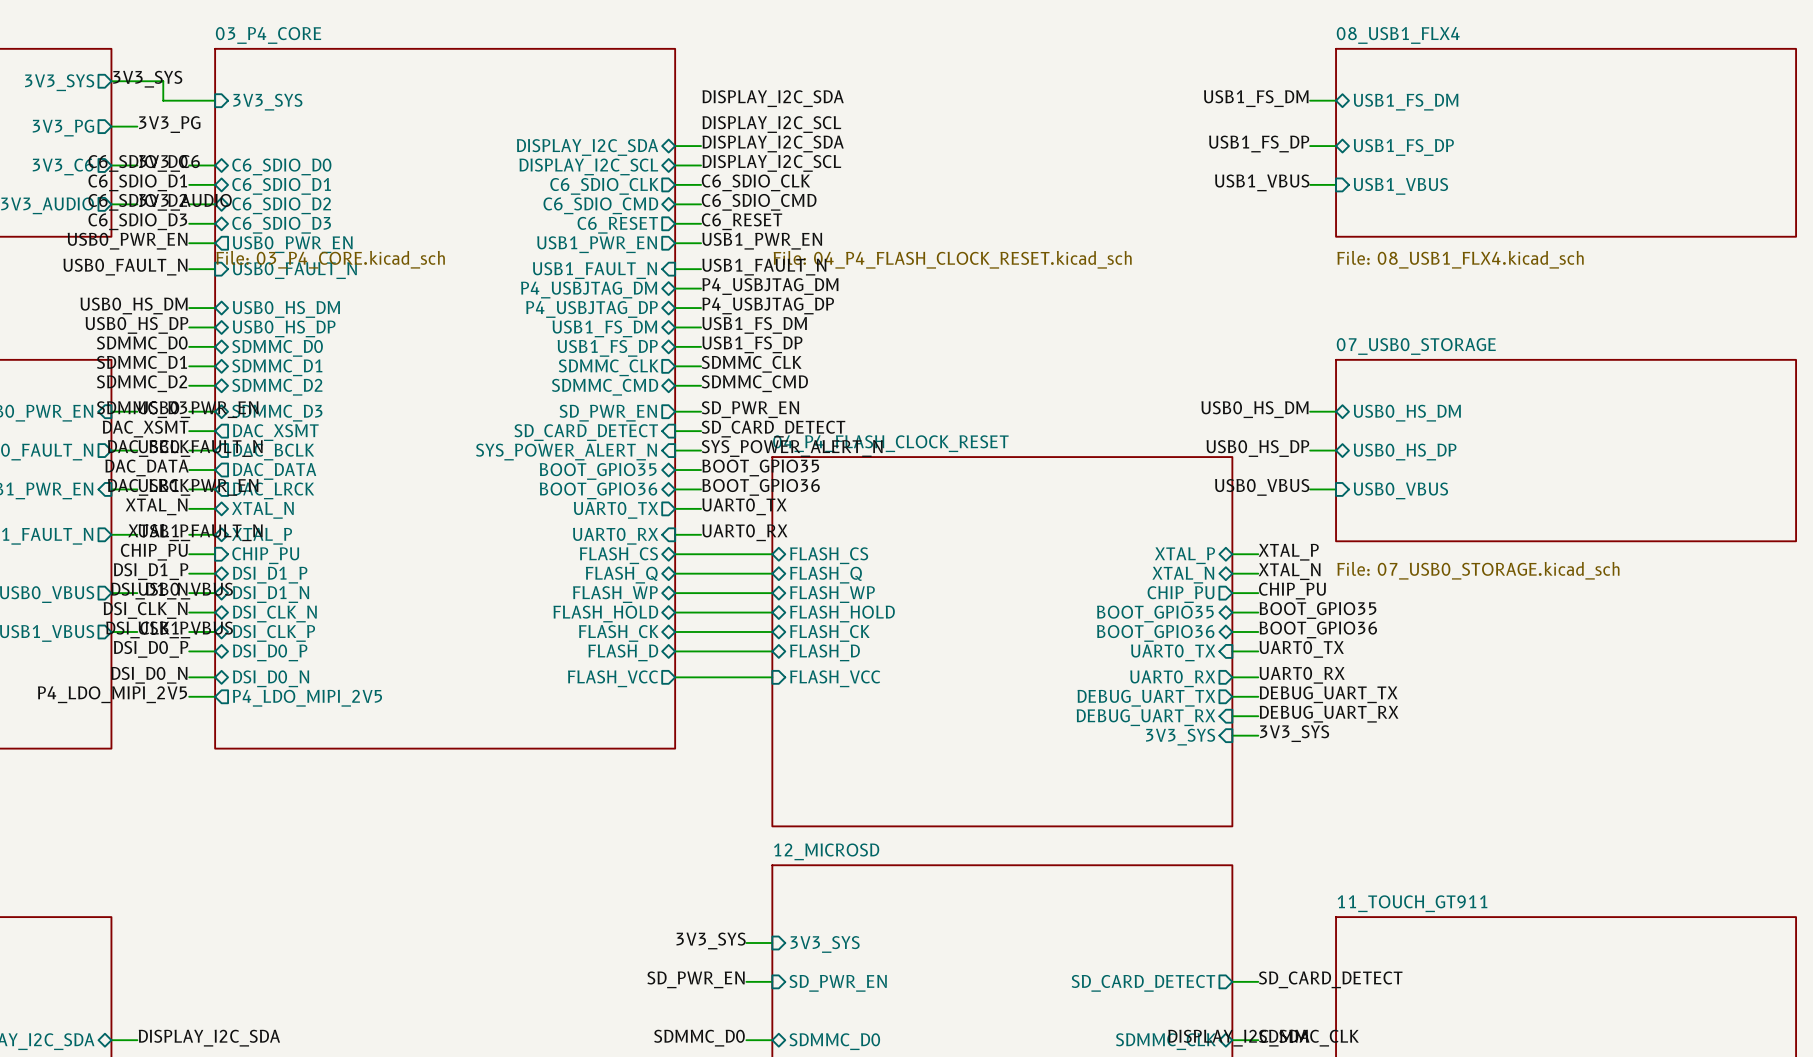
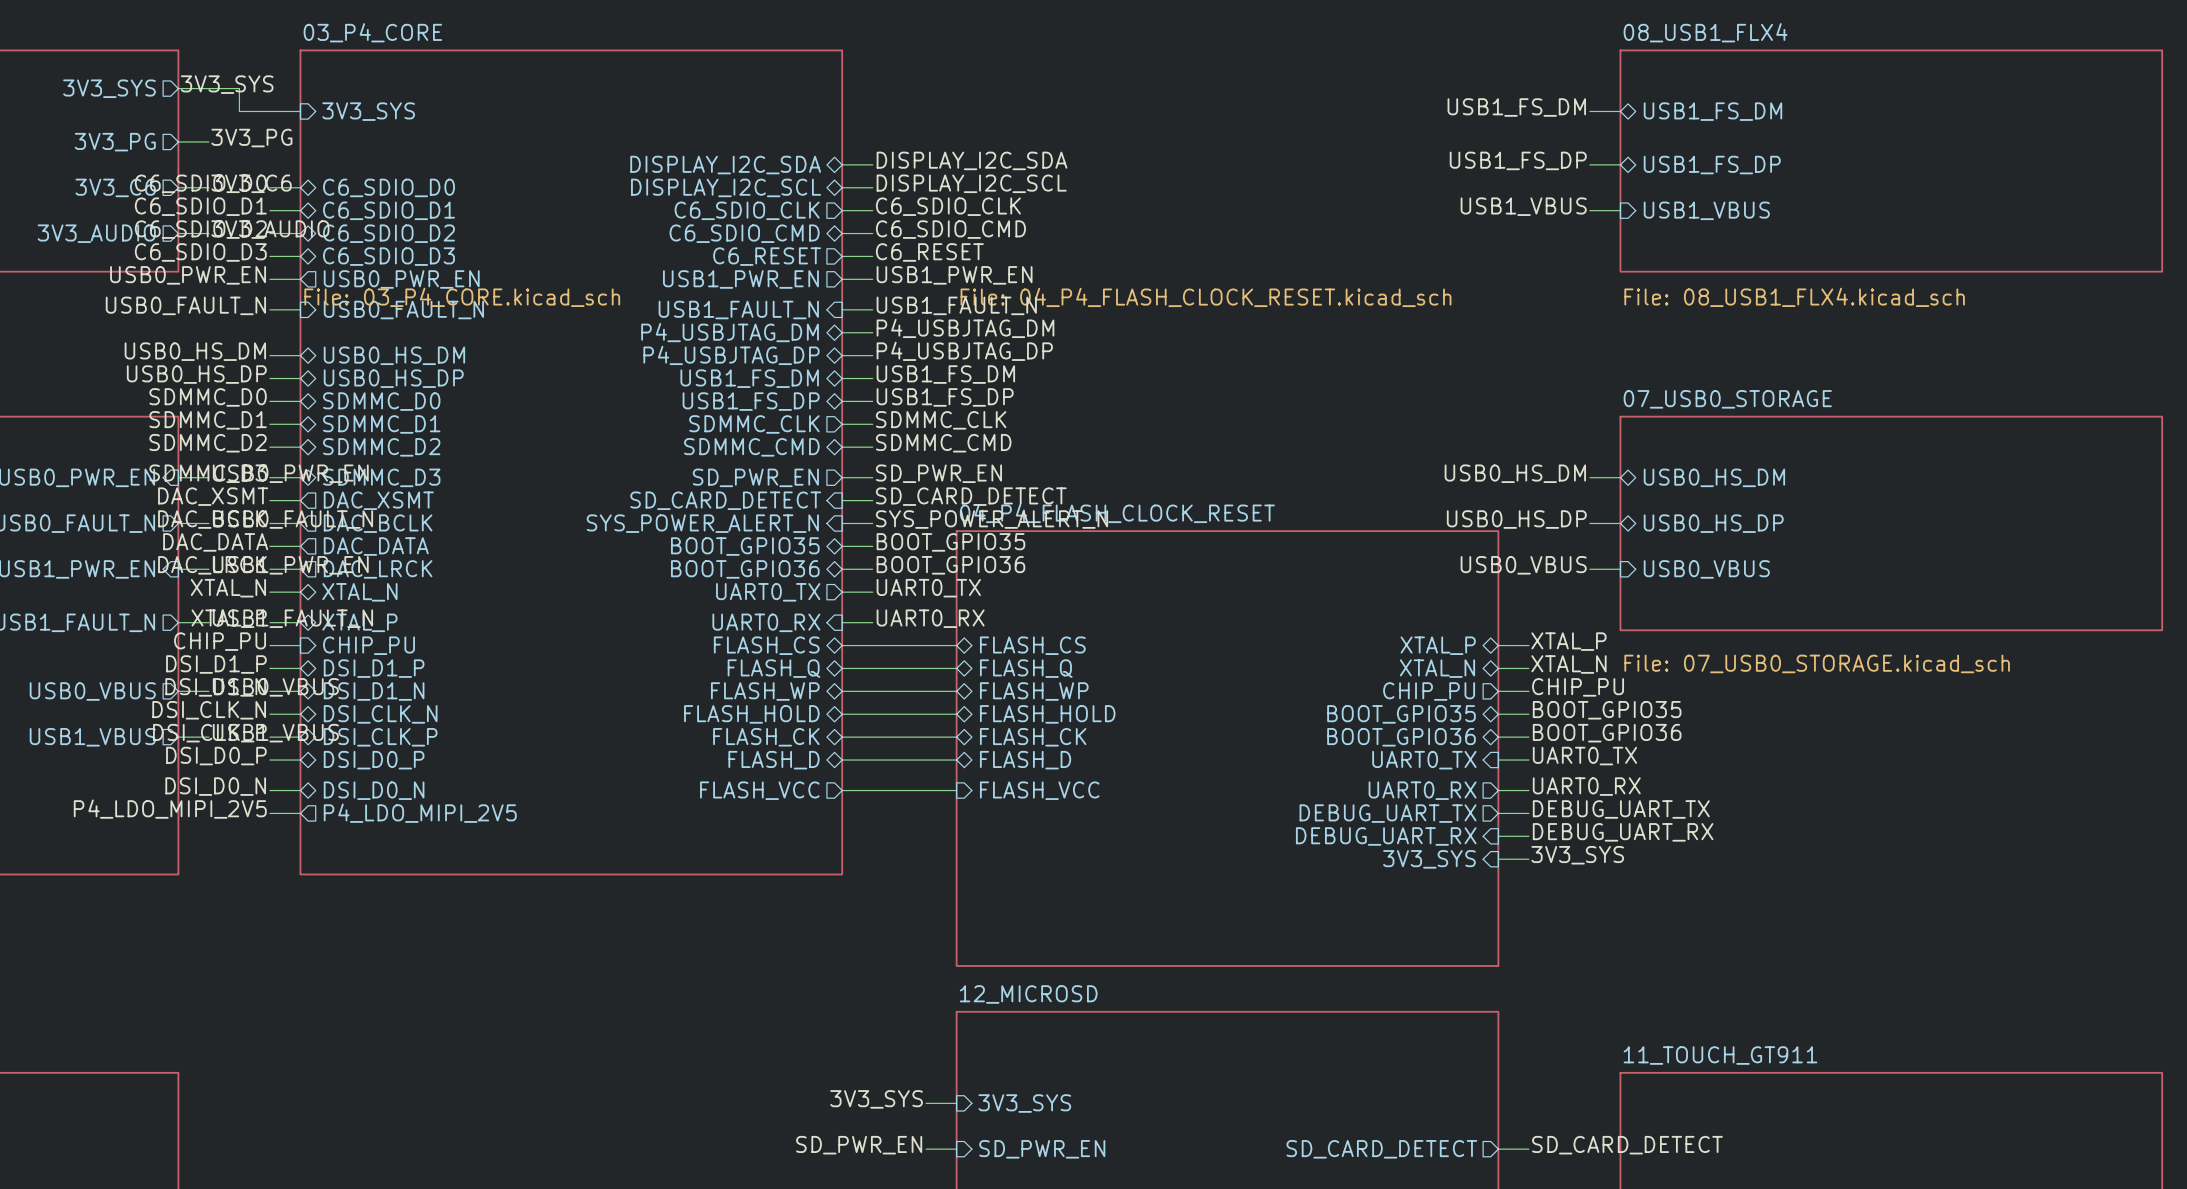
label: DISPLAY_I2C_SDA (773, 98) -> none
label: DISPLAY_I2C_SCL (771, 124) -> none

